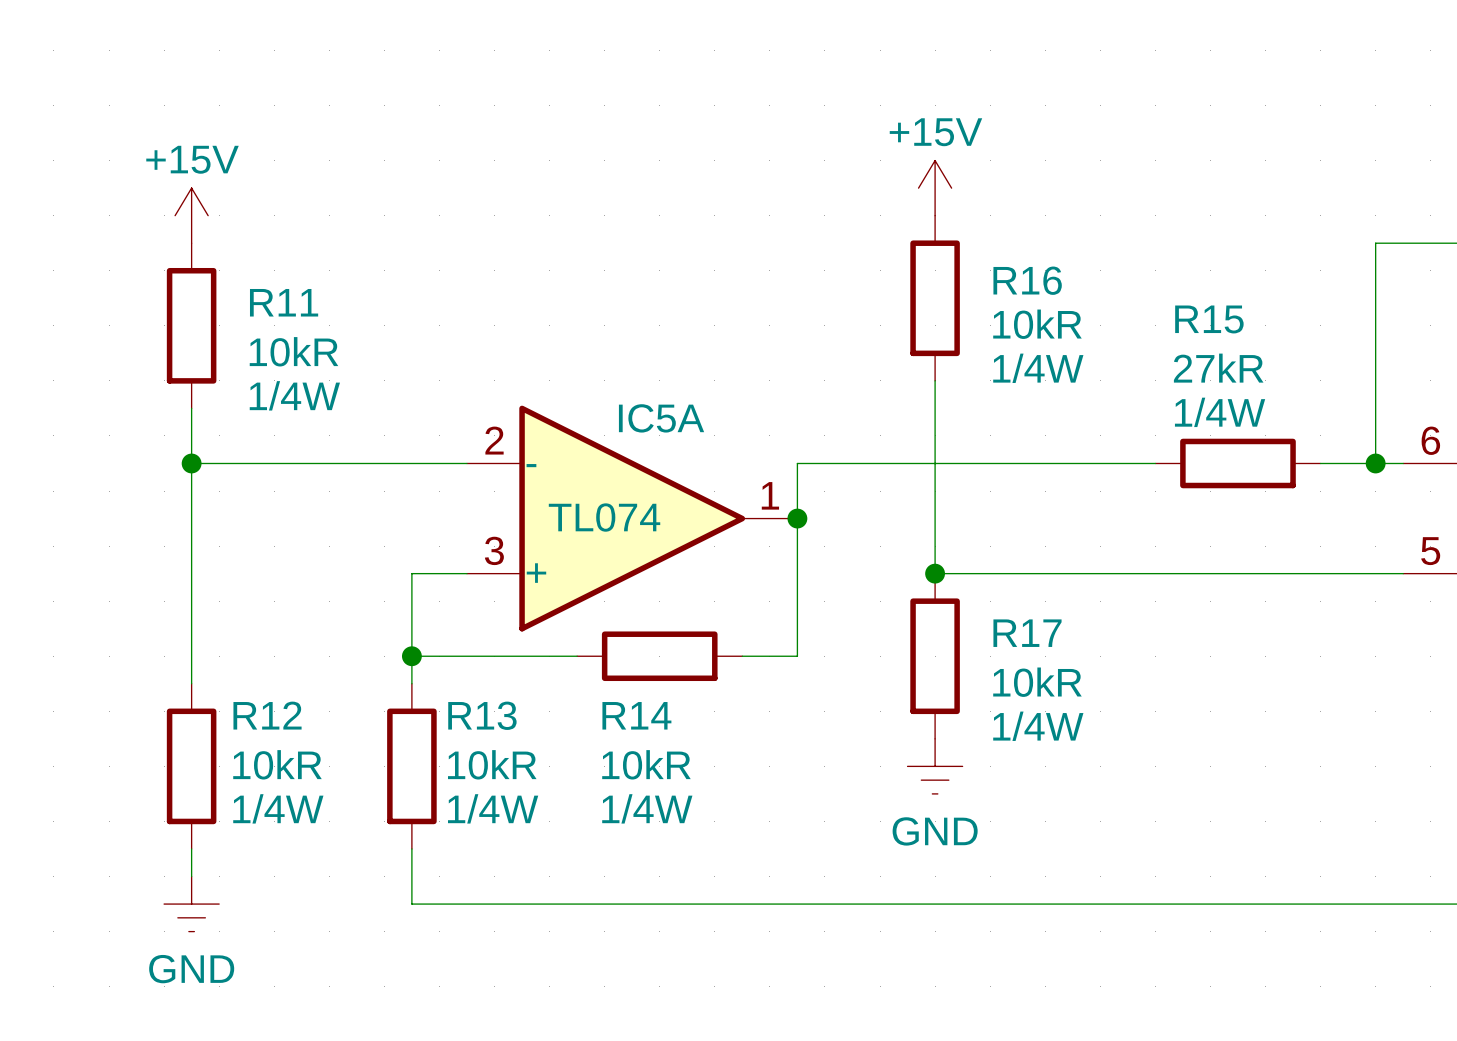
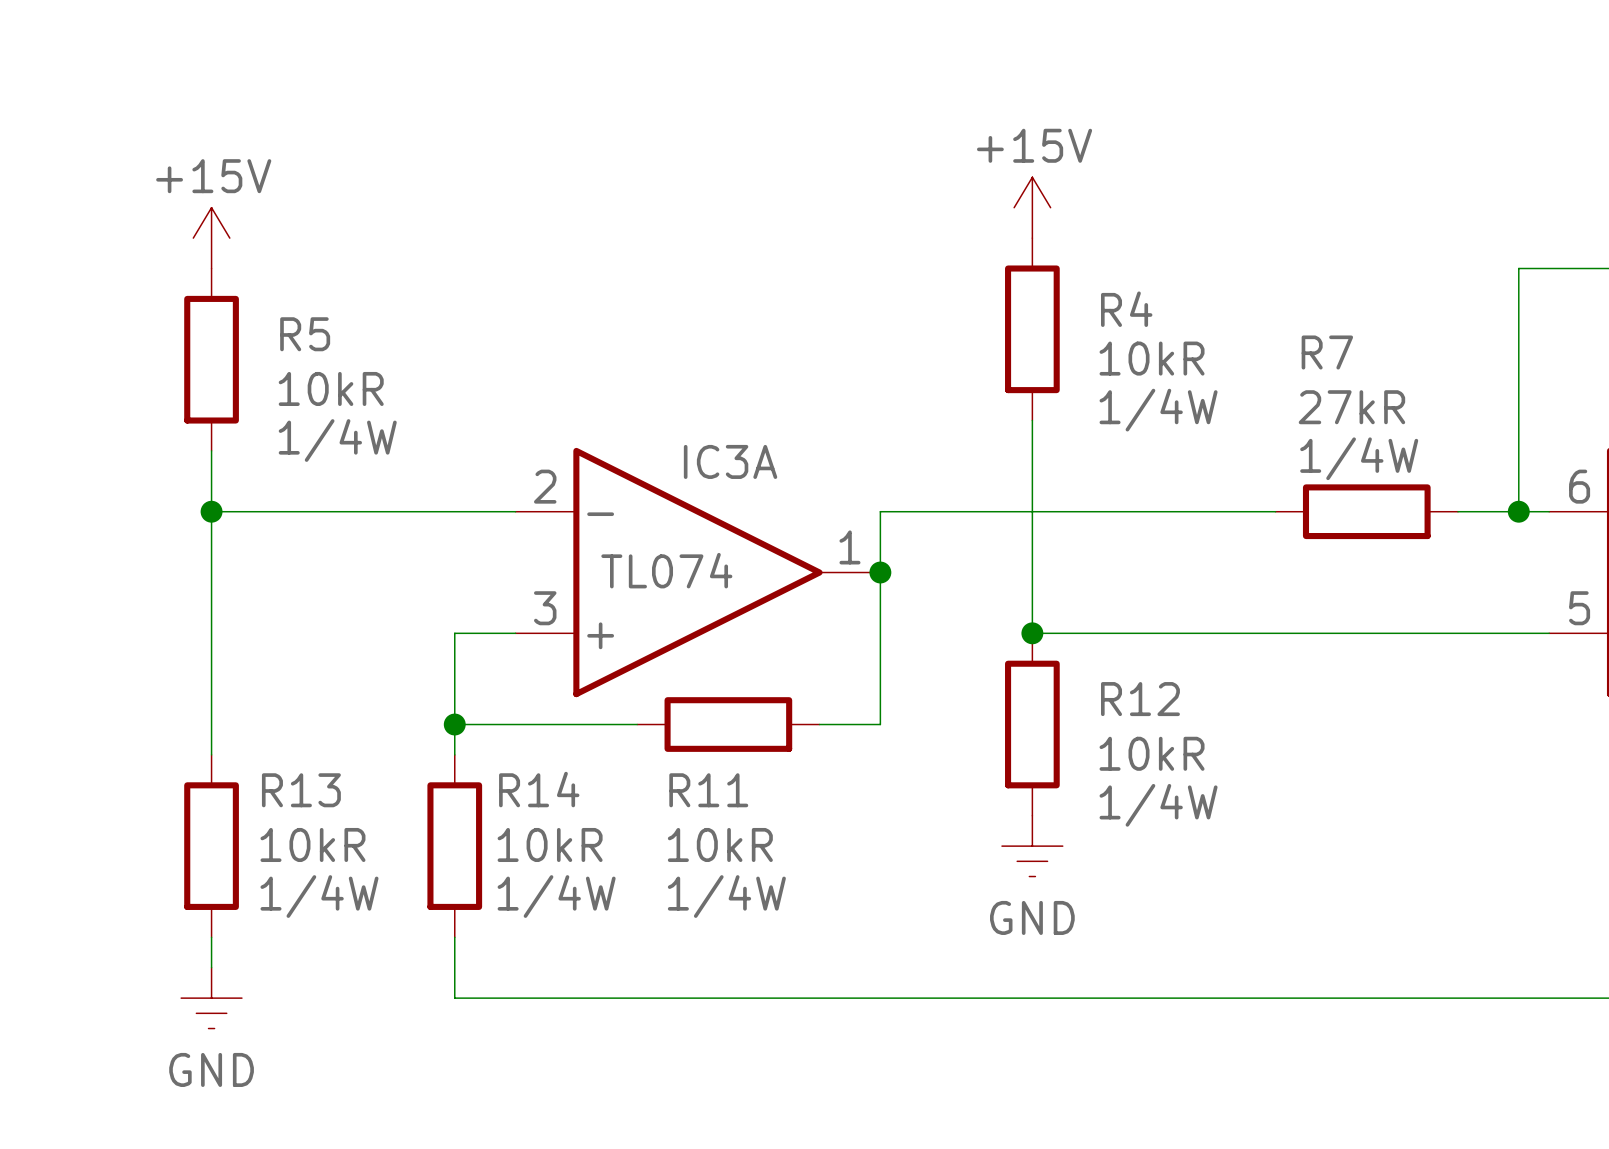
R16 name: R16 (1027, 280) -> R4 (1126, 309)
R11 name: R11 (284, 302) -> R5 (305, 334)
R15 name: R15 (1209, 319) -> R7 (1327, 352)
IC5A name: IC5A (661, 418) -> IC3A (730, 461)
R17 name: R17 (1027, 633) -> R12 (1140, 699)
R12 name: R12 (267, 715) -> R13 (301, 790)
R13 name: R13 (482, 715) -> R14 (539, 789)
R14 name: R14 (636, 715) -> R11 (708, 790)

